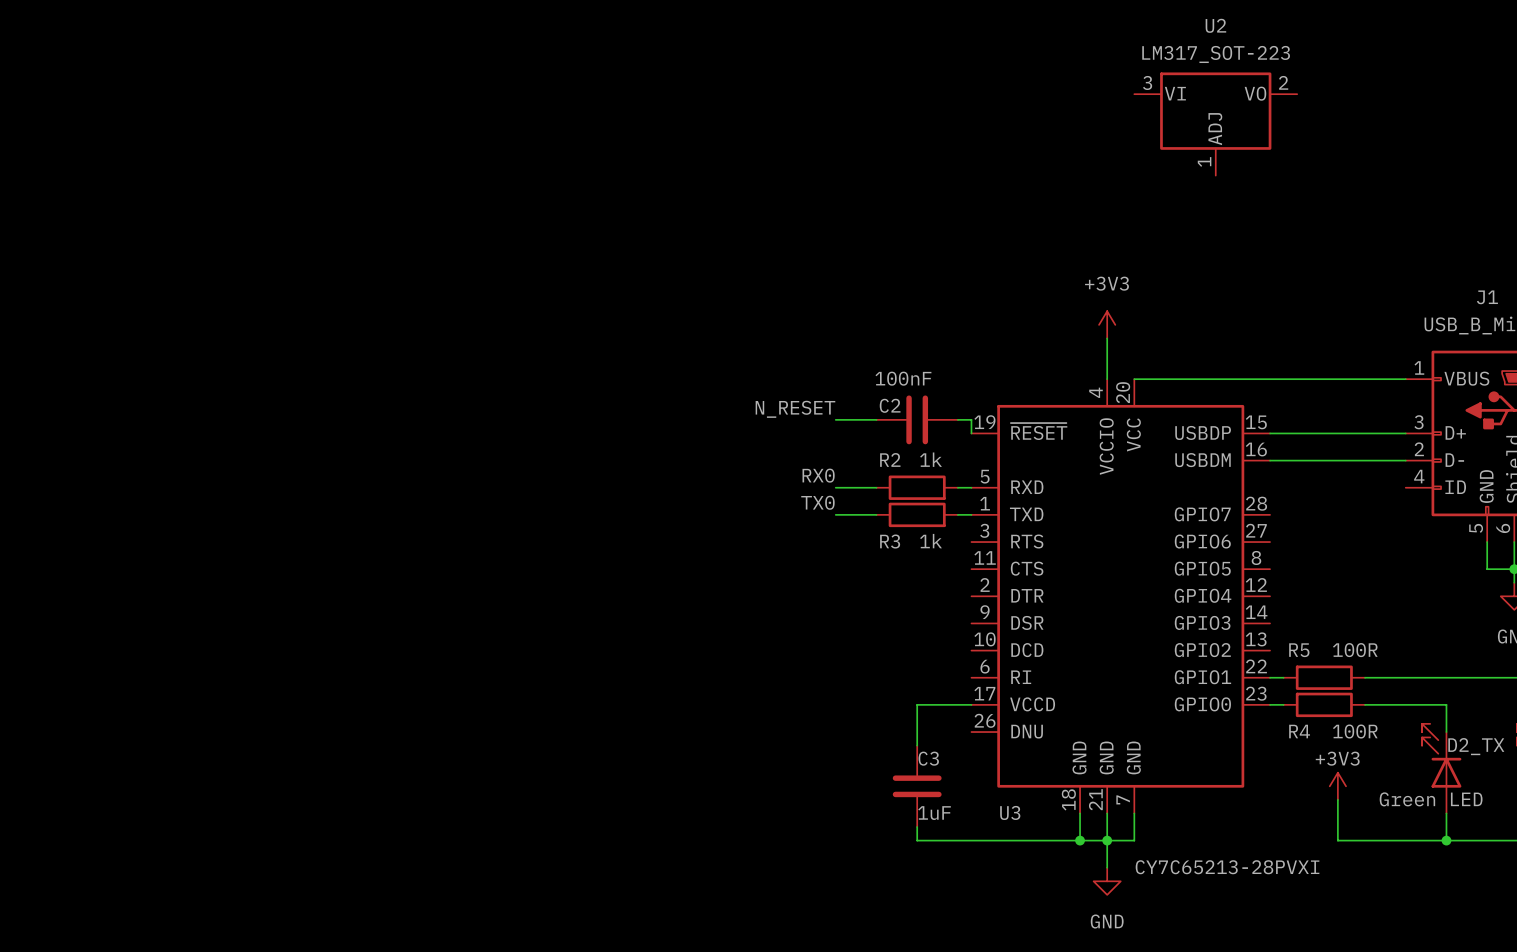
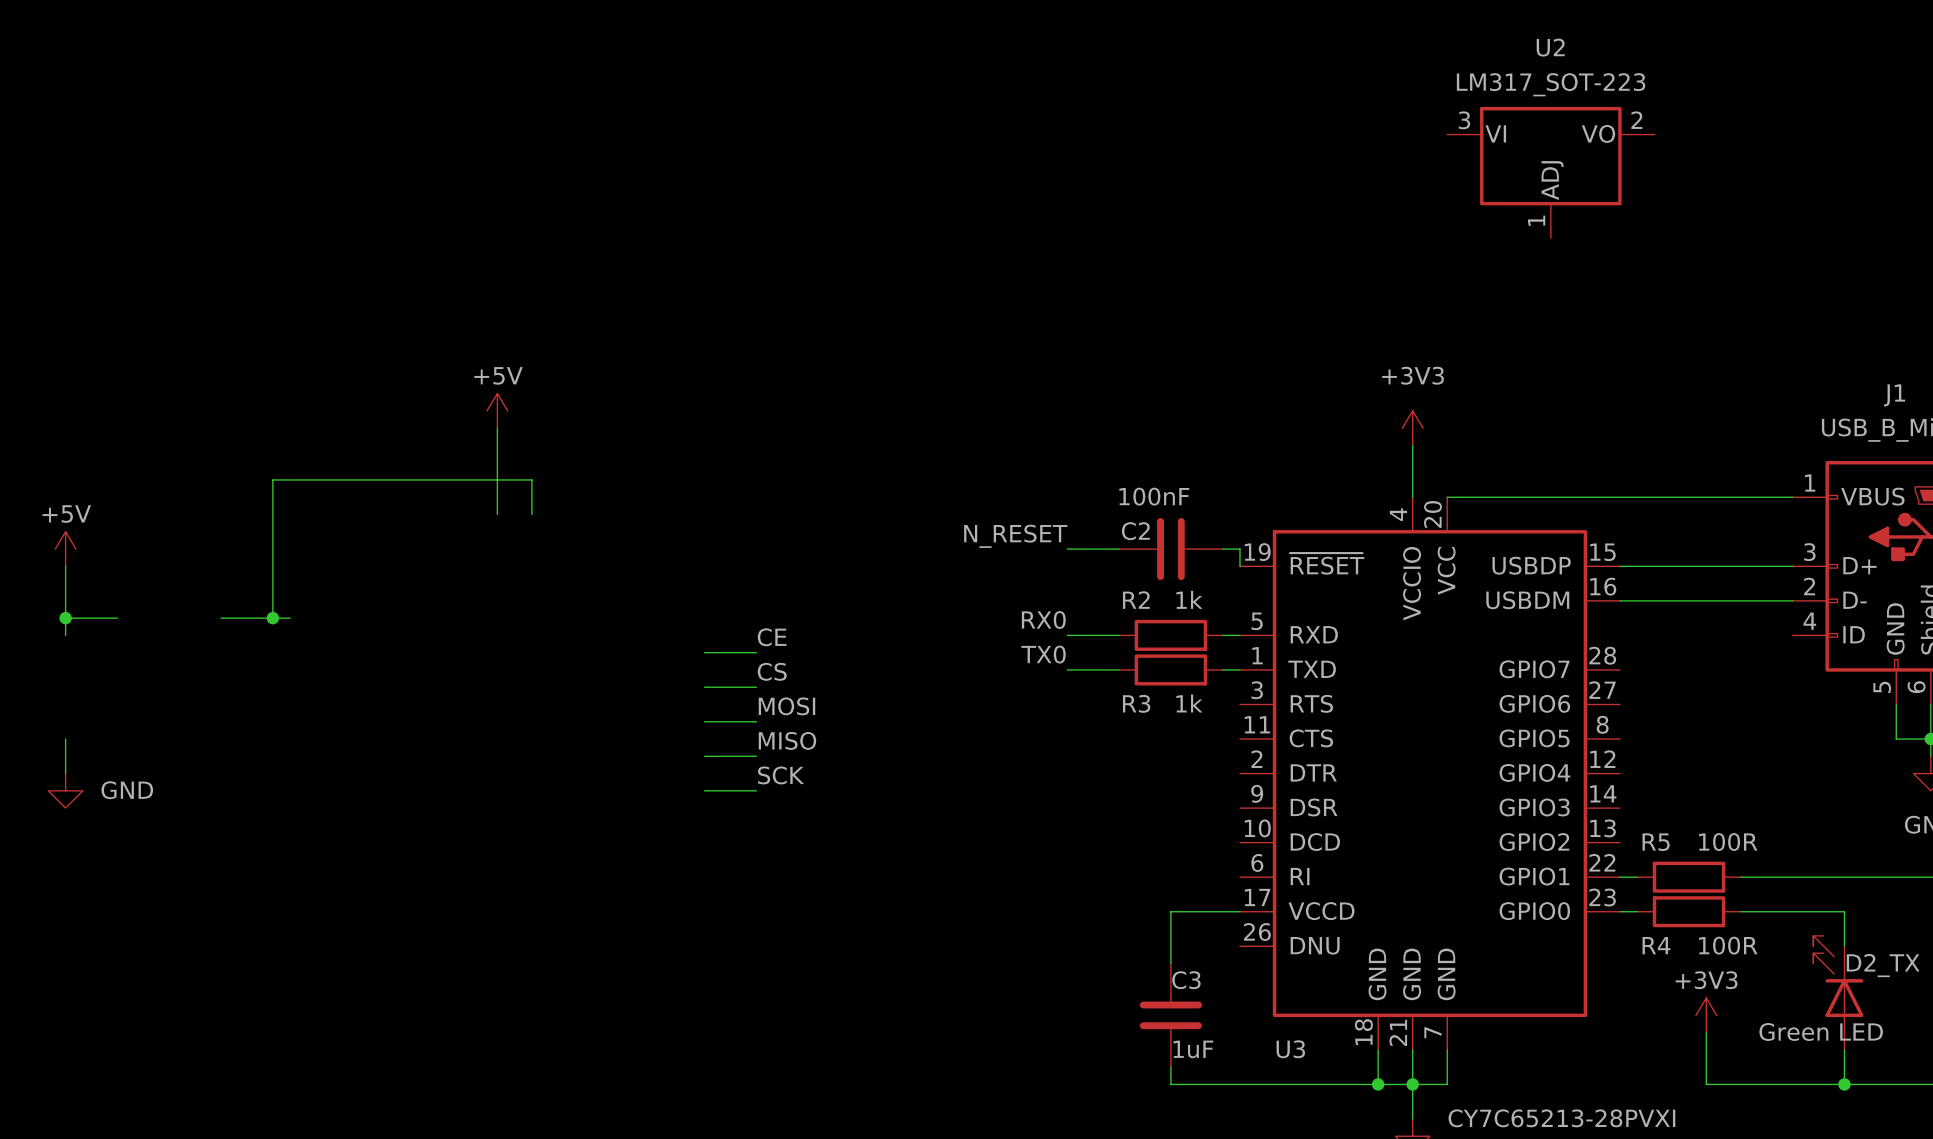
power symbol: none -> +5V (497, 410)
wire: none -> (497, 428) (497, 514)
wire: none -> (531, 514) (531, 479) (272, 479) (272, 618)
power symbol: none -> +5V (65, 549)
wire: none -> (65, 566) (65, 635)
wire: none -> (65, 618) (117, 618)
junction: none -> (65, 618)
wire: none -> (221, 618) (290, 618)
junction: none -> (272, 618)
label: none -> CE (772, 637)
wire: none -> (704, 652) (756, 652)
label: none -> CS (772, 671)
wire: none -> (704, 687) (756, 687)
label: none -> MOSI (786, 706)
wire: none -> (704, 721) (756, 721)
wire: none -> (65, 739) (65, 773)
label: none -> MISO (787, 740)
wire: none -> (704, 756) (756, 756)
label: none -> SCK (781, 775)
power symbol: none -> GND (65, 790)
wire: none -> (704, 790) (756, 790)

